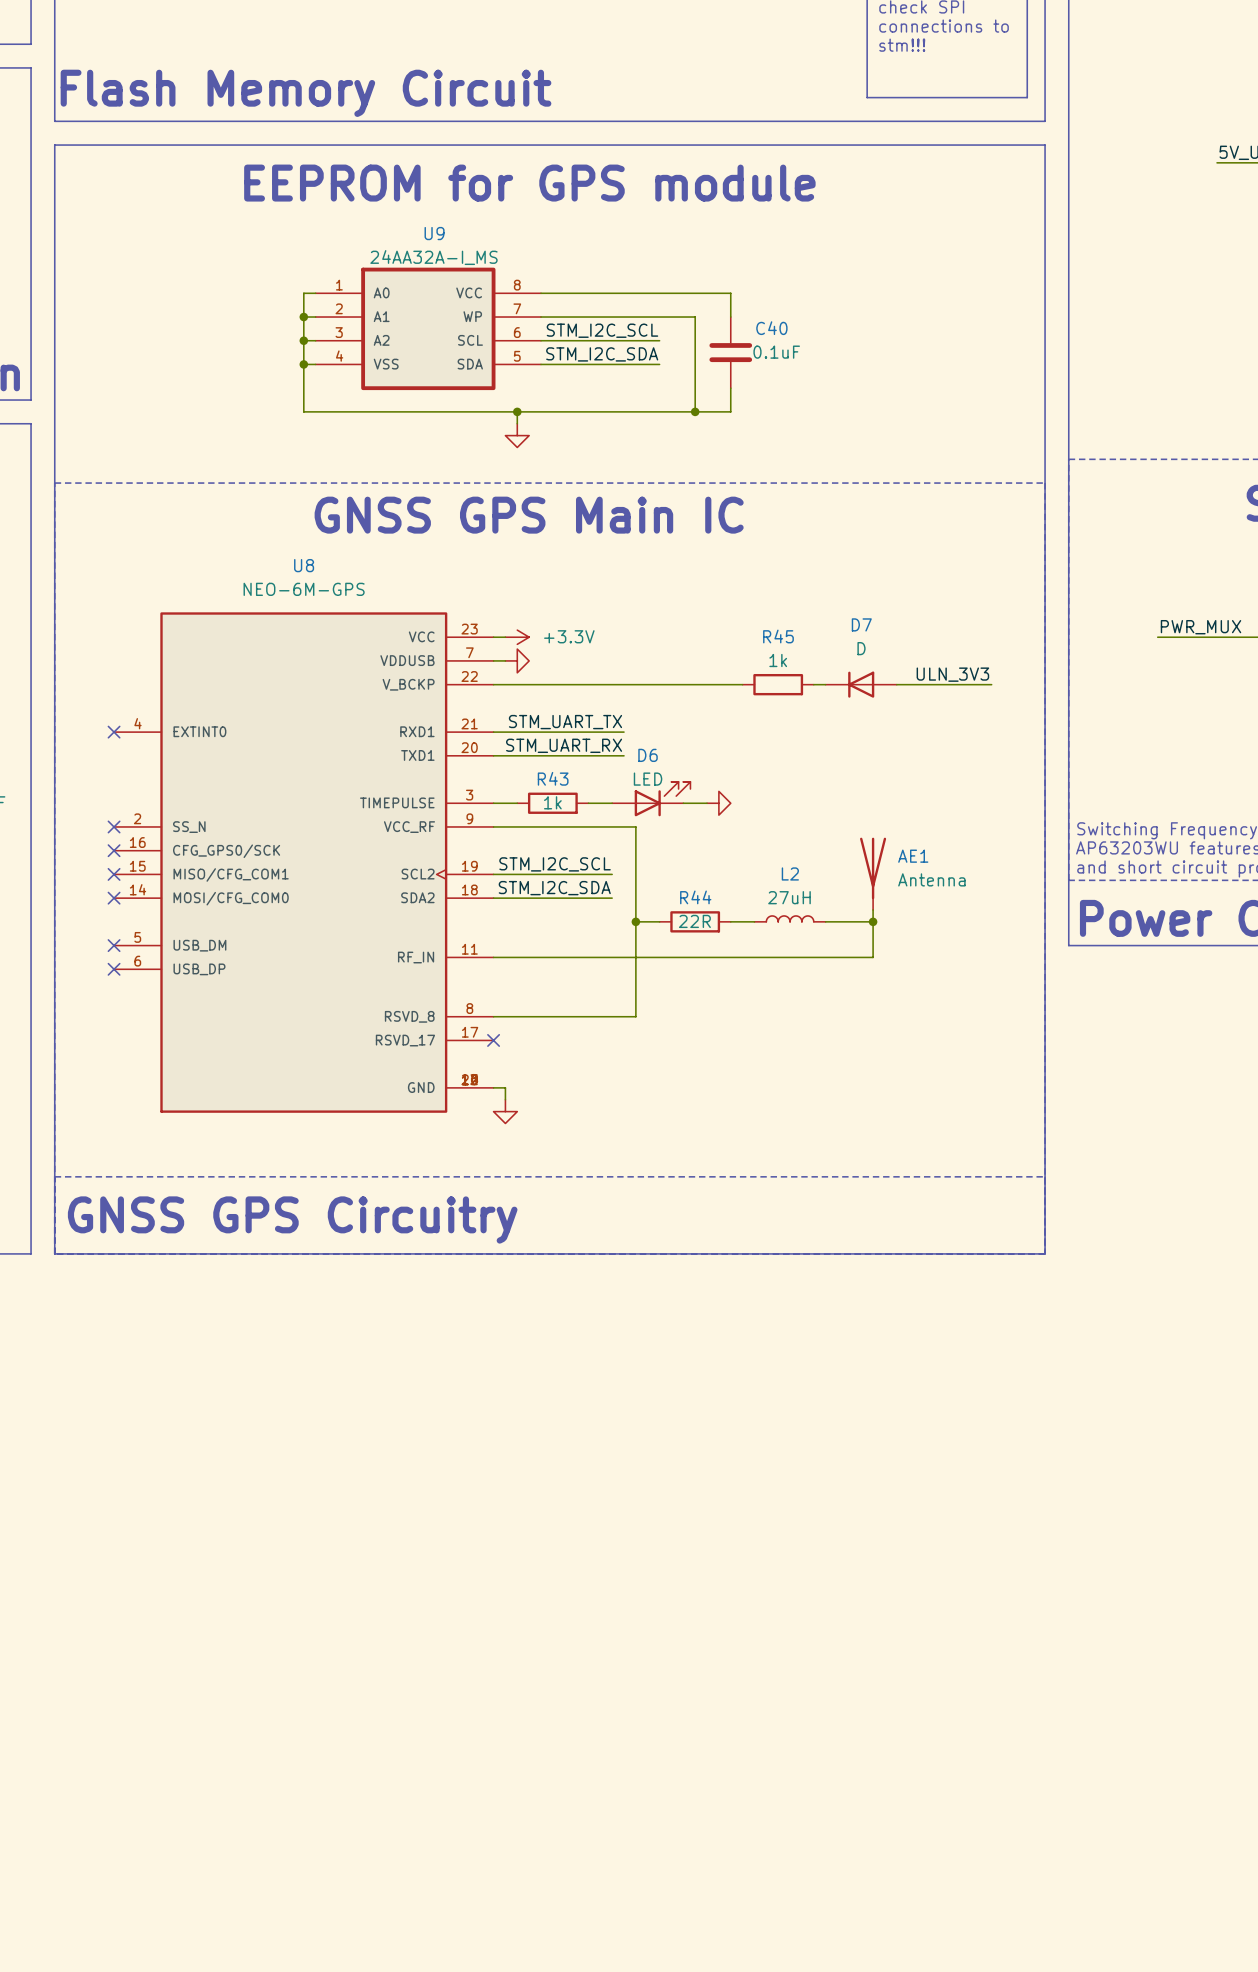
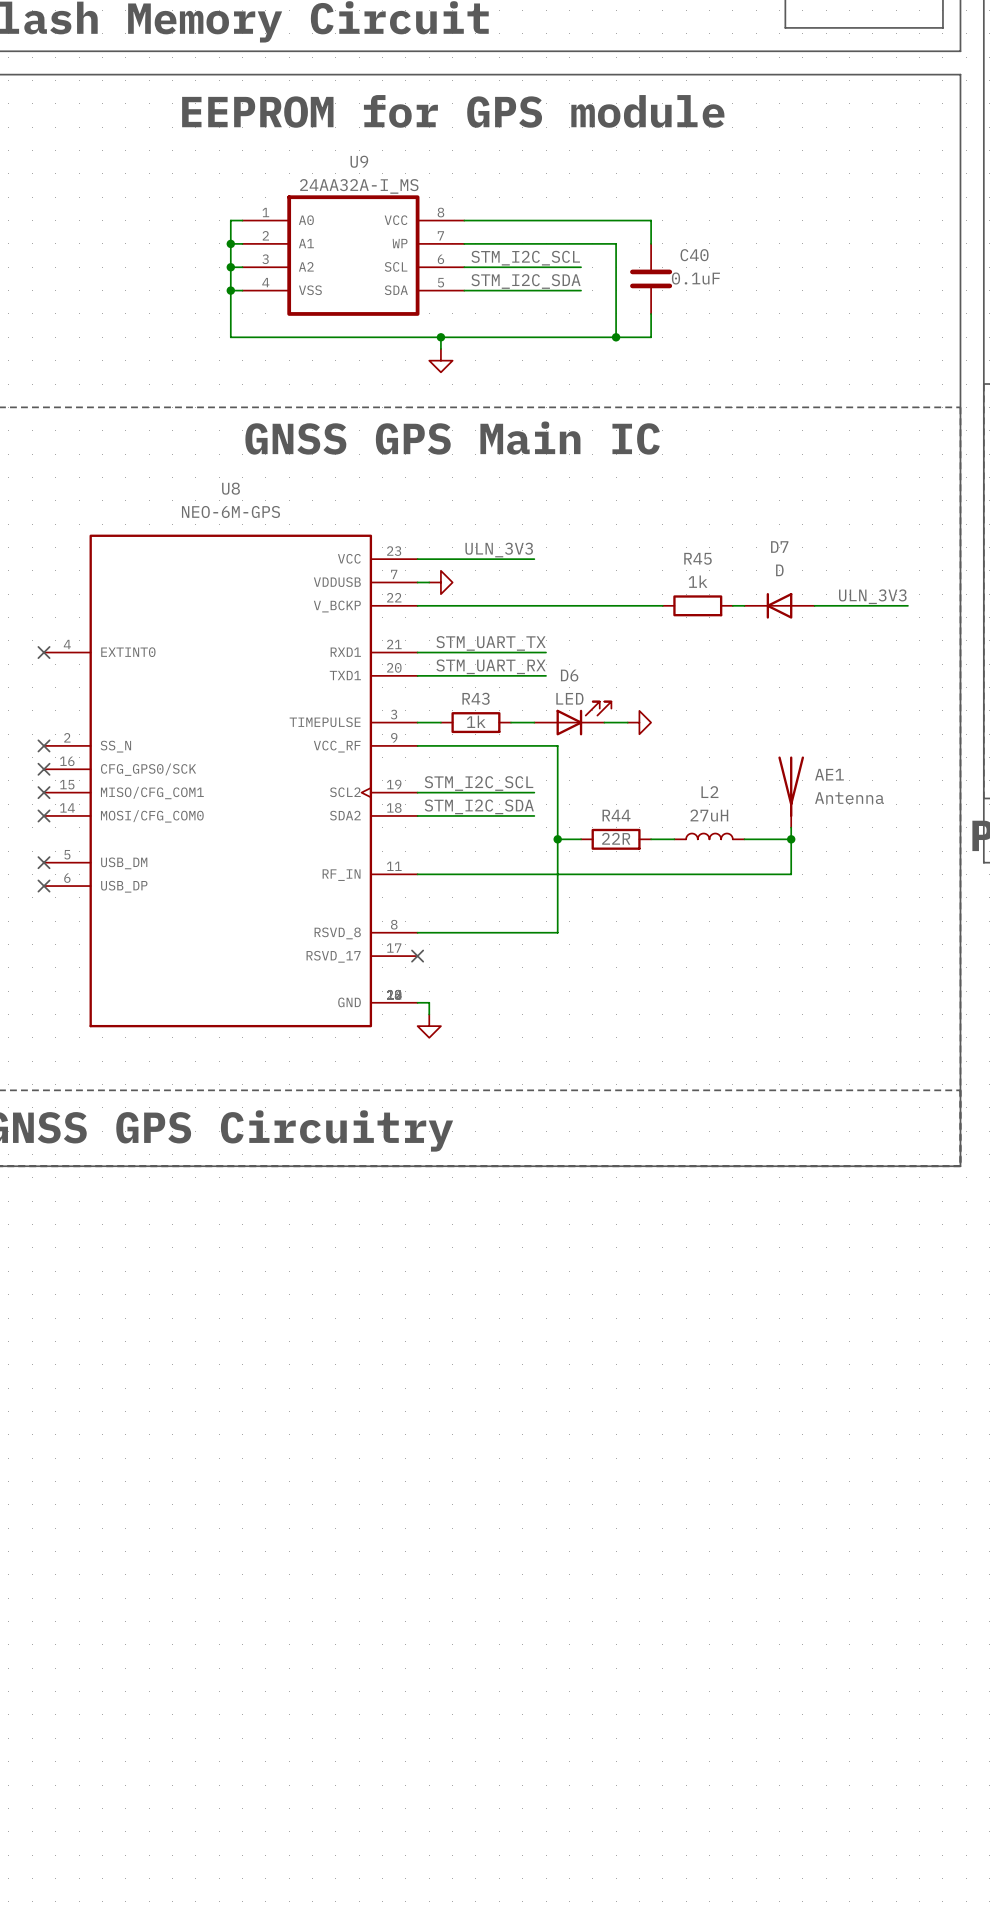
label: none -> ULN_3V3 (499, 550)
wire: none -> (429, 559) (534, 559)
power symbol: +3.3V (517, 637) -> none

